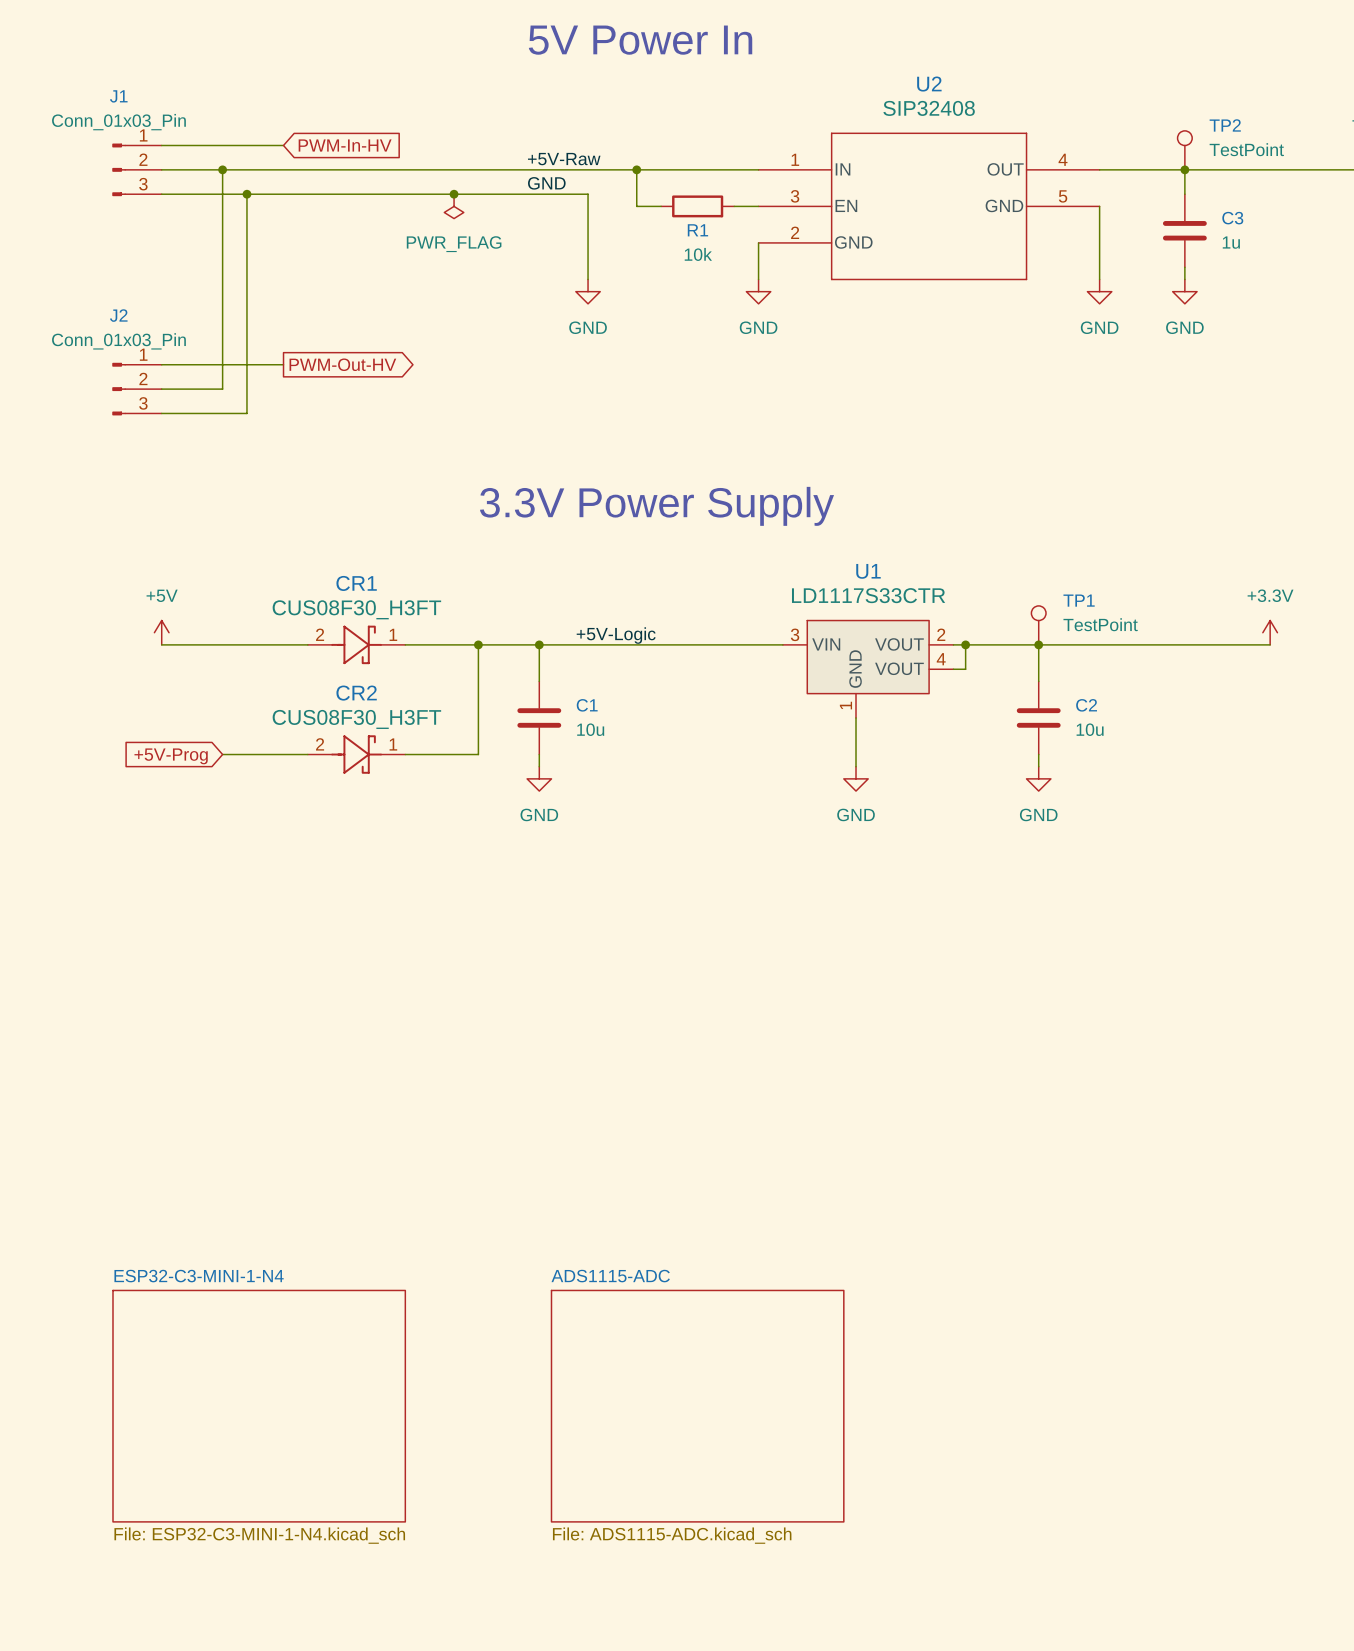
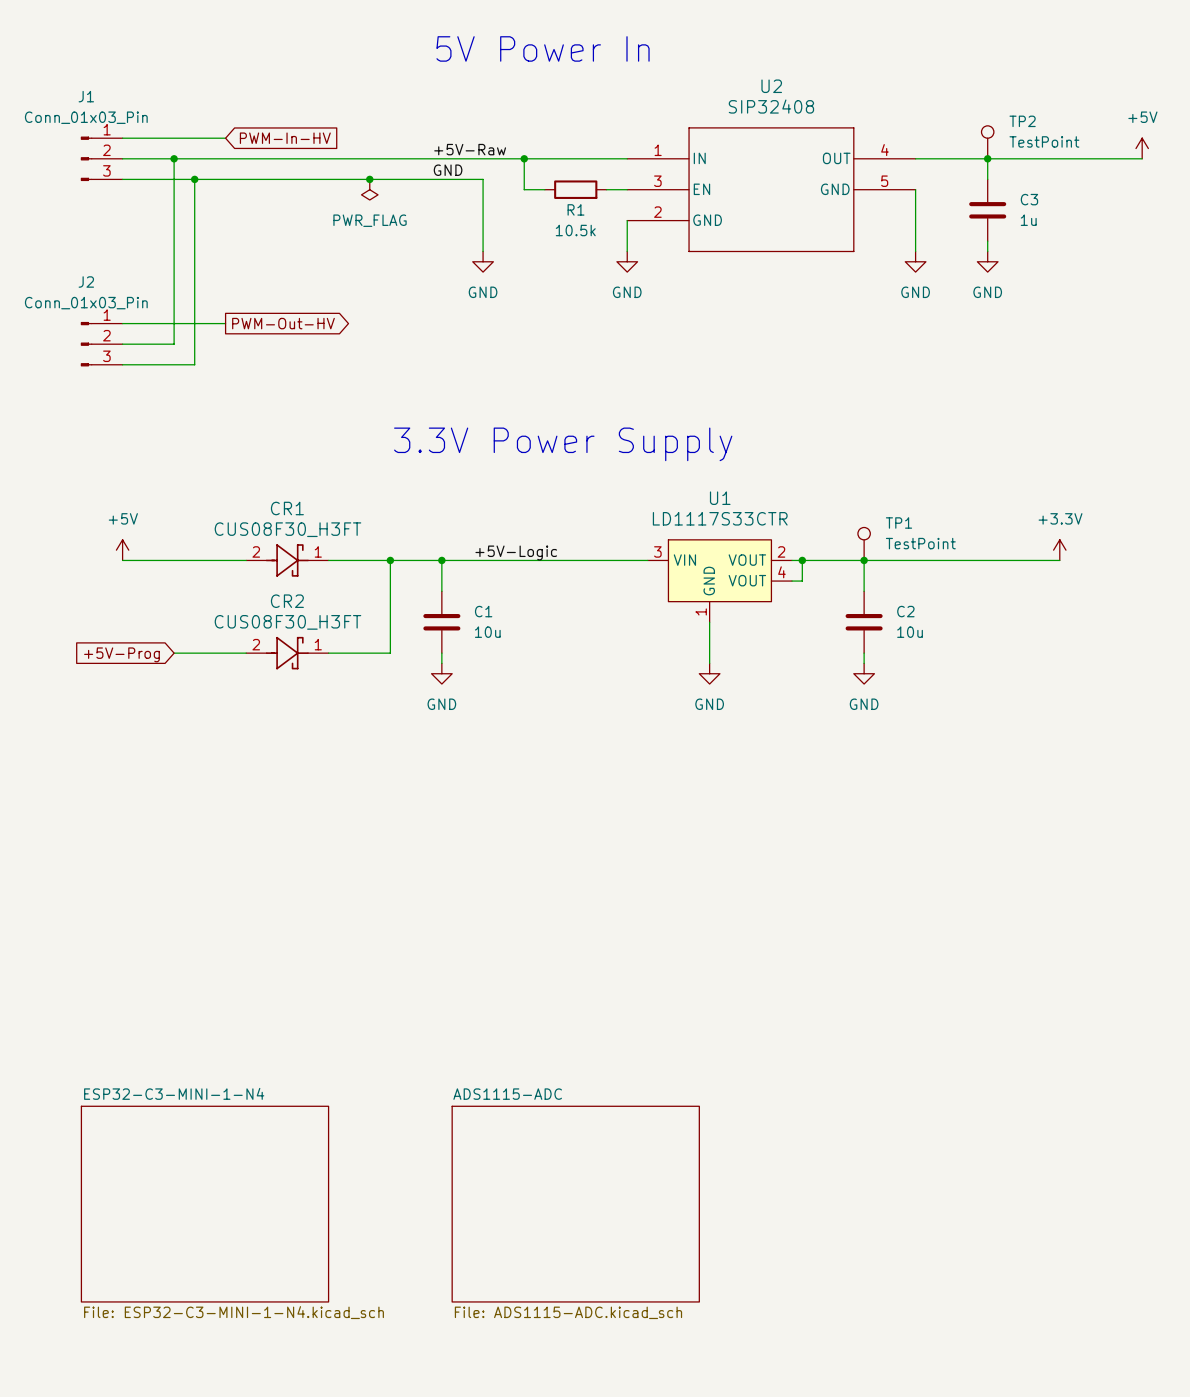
R1 value: 10k (698, 254) -> 10.5k (575, 230)

